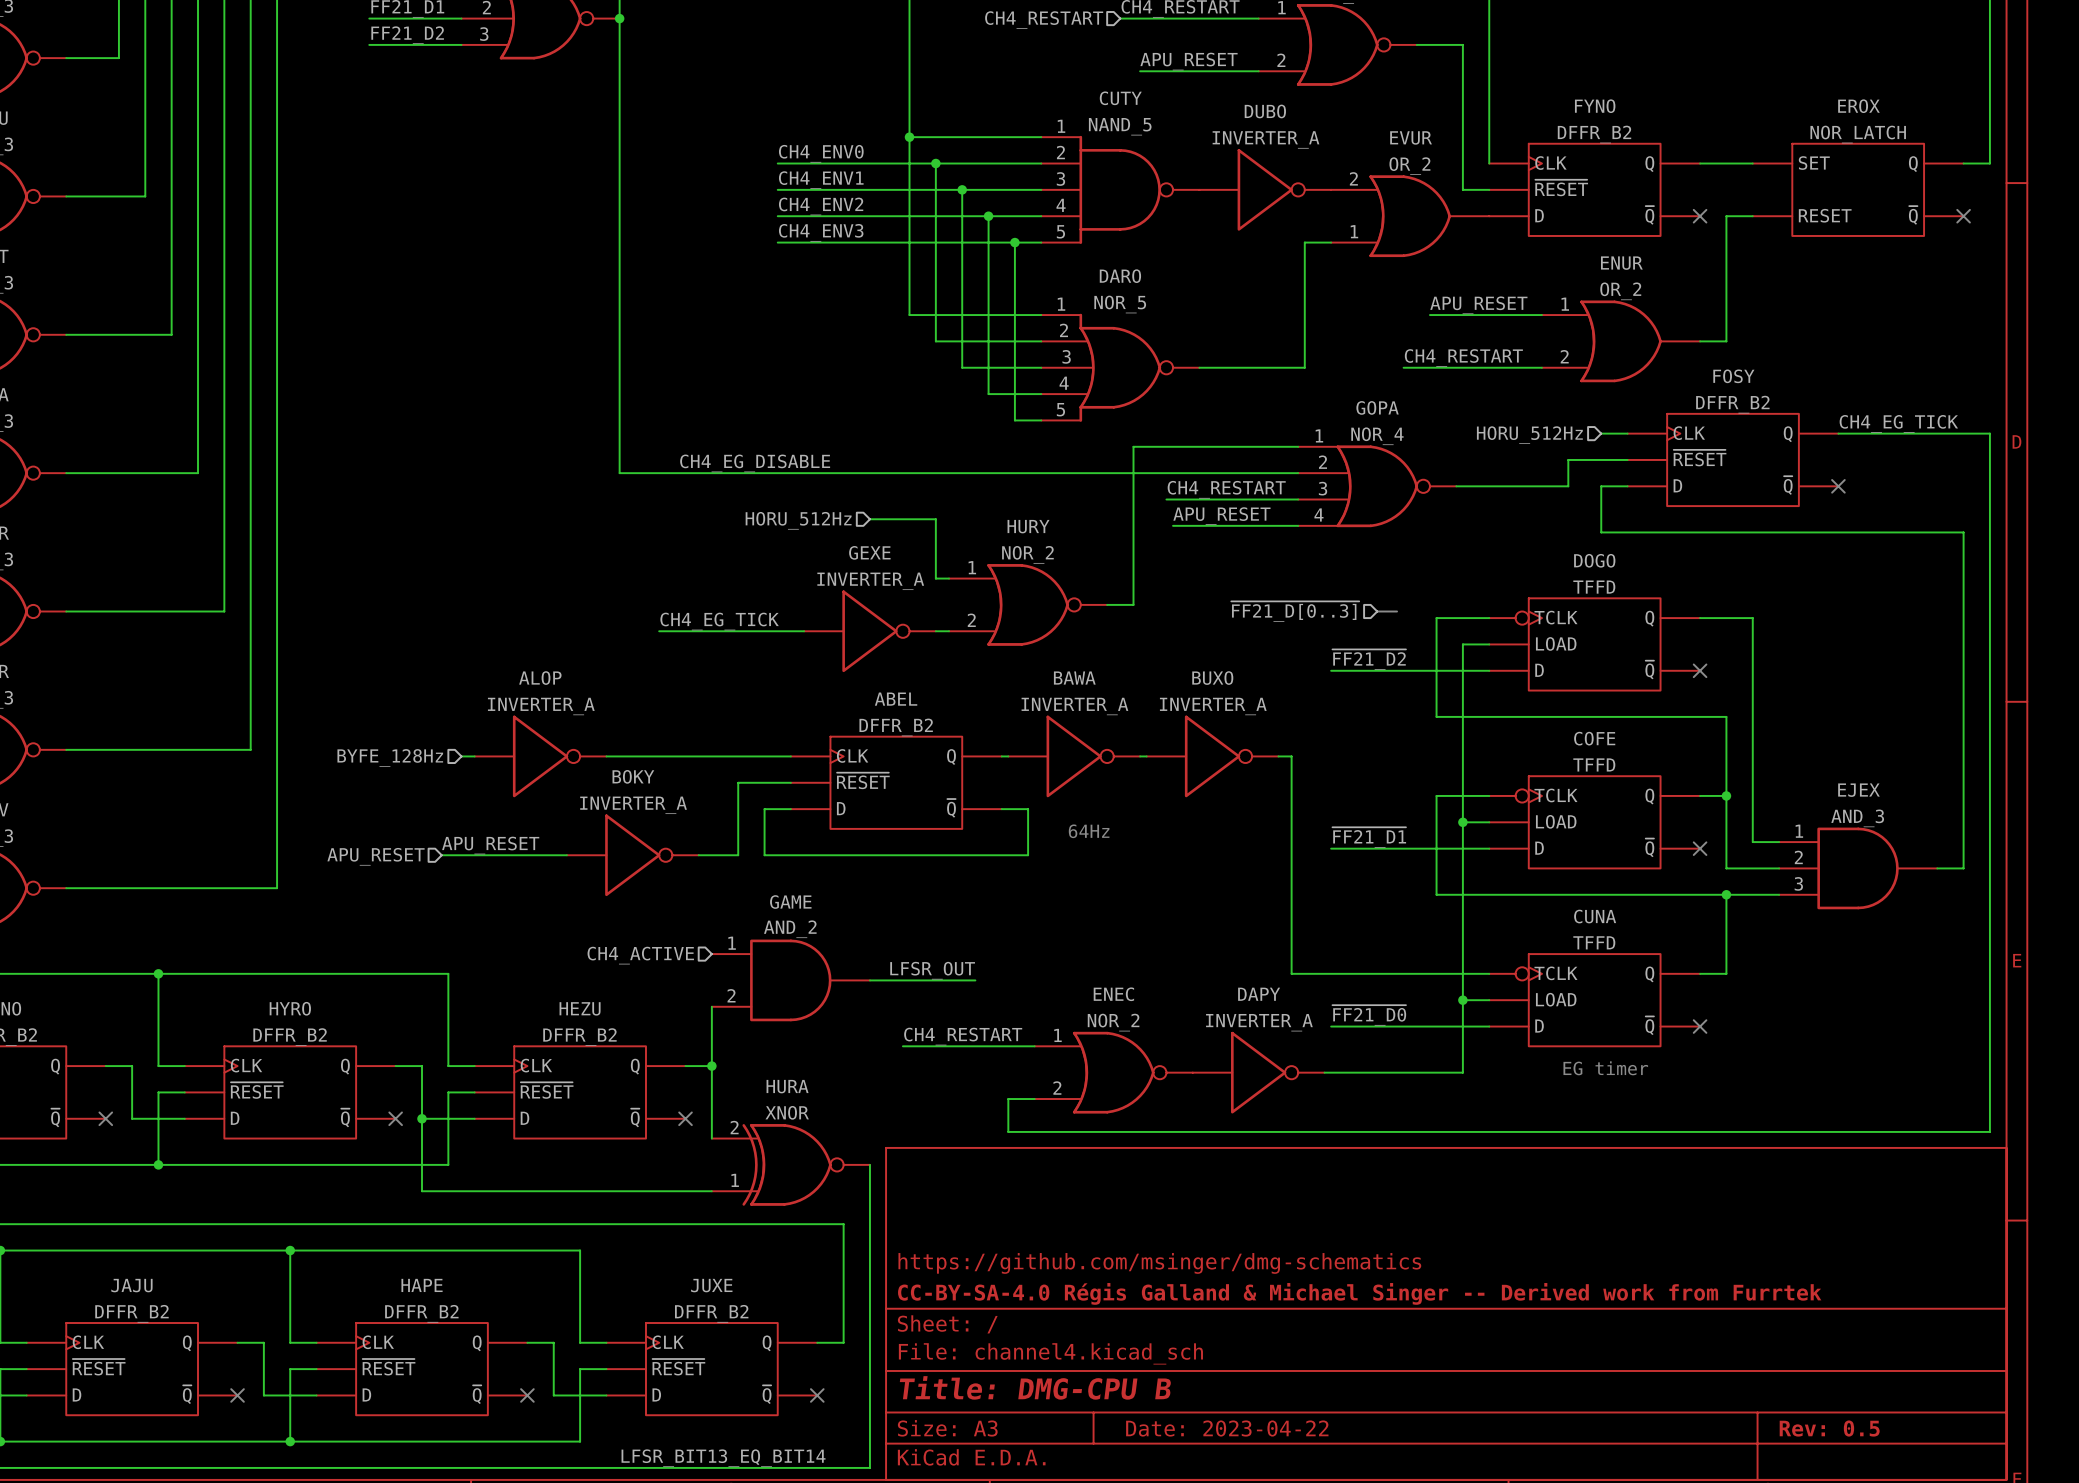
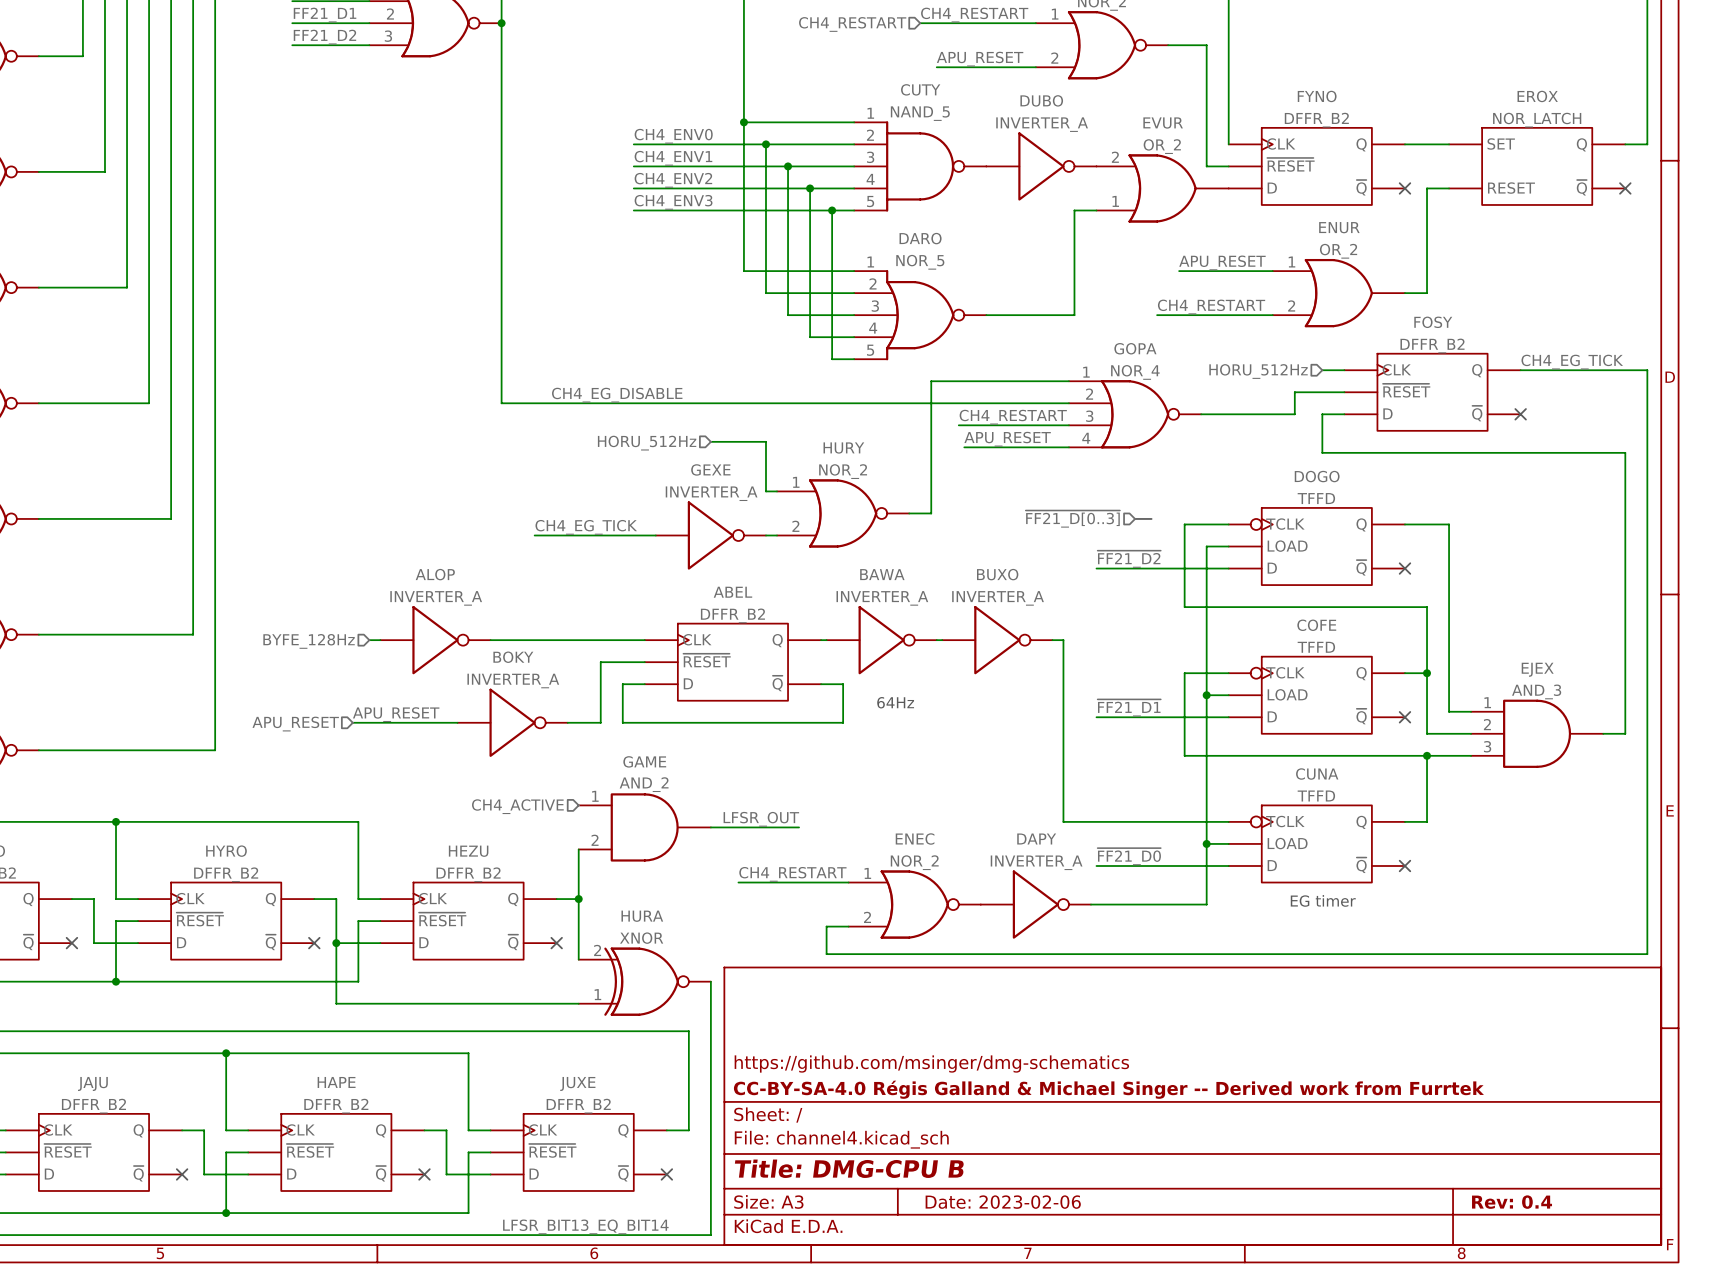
title block: Date: 2023-04-22 (1227, 1428) -> Date: 2023-02-06 (1003, 1202)
title block: Rev: 0.5 (1829, 1428) -> Rev: 0.4 (1512, 1202)

